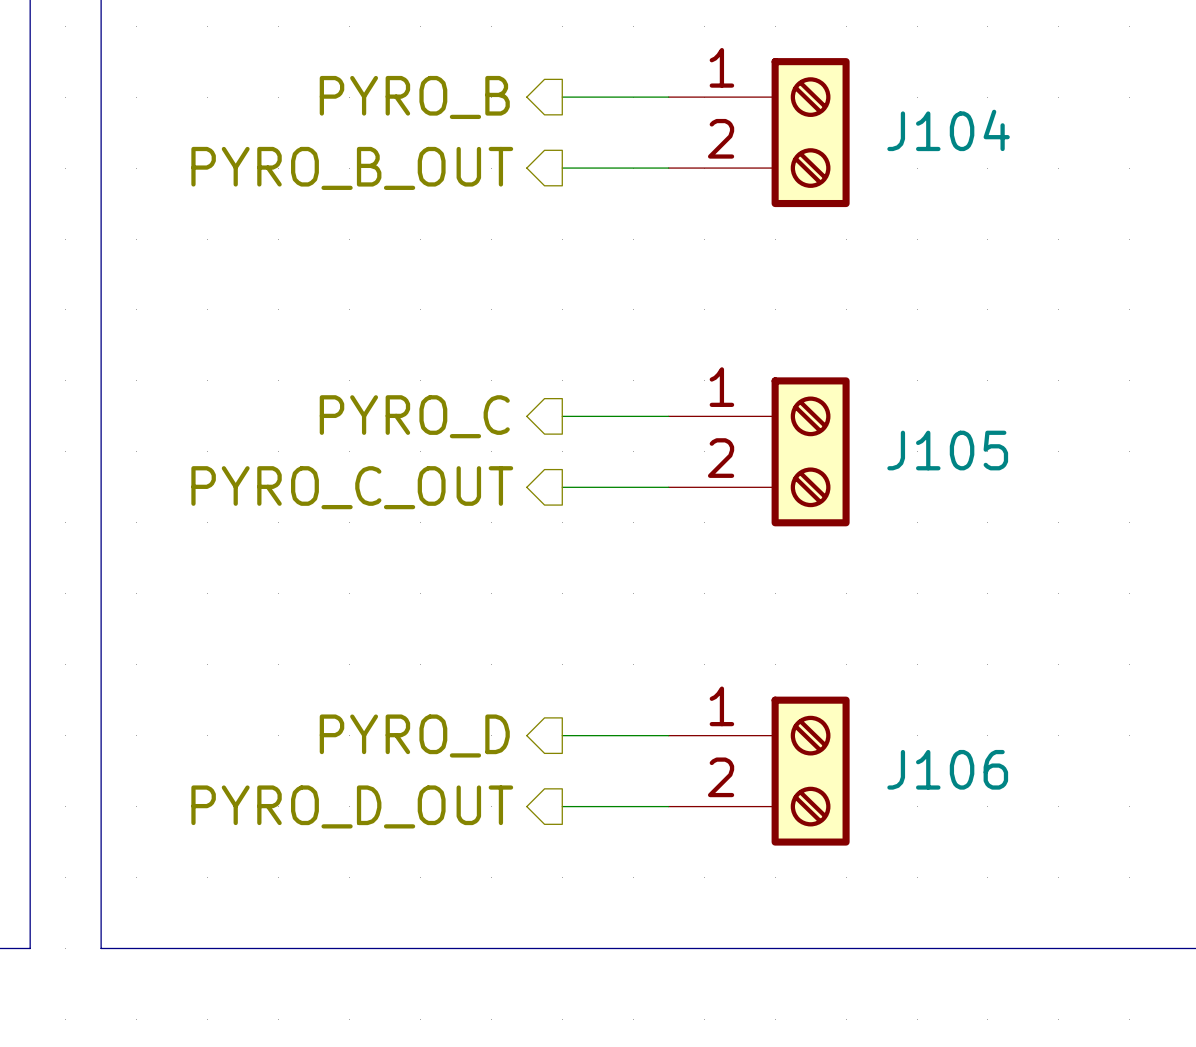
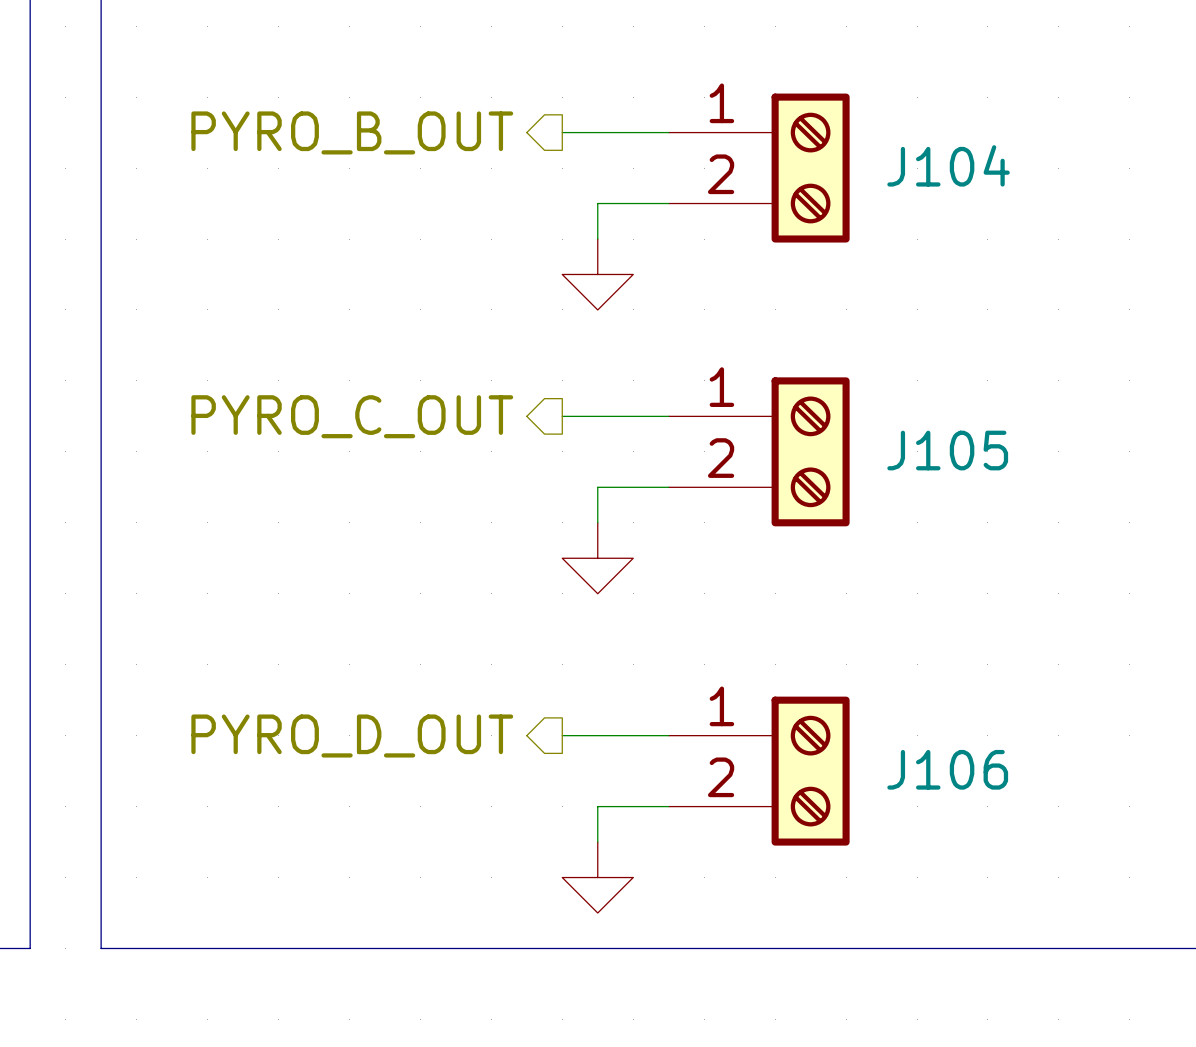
hierarchical label: PYRO_B (414, 97) -> none
wire: (562, 97) (668, 97) -> (562, 132) (668, 132)
J104 position: (759, 132) -> (759, 168)
hierarchical label position: PYRO_B_OUT (352, 168) -> PYRO_B_OUT (352, 132)
wire: (562, 168) (668, 168) -> none
wire: none -> (668, 203) (597, 203) (597, 239)
power symbol: none -> (597, 274)
hierarchical label: PYRO_C (414, 416) -> PYRO_C_OUT (352, 416)
hierarchical label: PYRO_C_OUT (352, 487) -> none
wire: (562, 487) (597, 487) -> (597, 522) (597, 487)
power symbol: none -> (597, 558)
hierarchical label: PYRO_D (414, 736) -> PYRO_D_OUT (352, 736)
hierarchical label: PYRO_D_OUT (352, 806) -> none
wire: (562, 806) (597, 806) -> (597, 842) (597, 806)
power symbol: none -> (597, 877)

